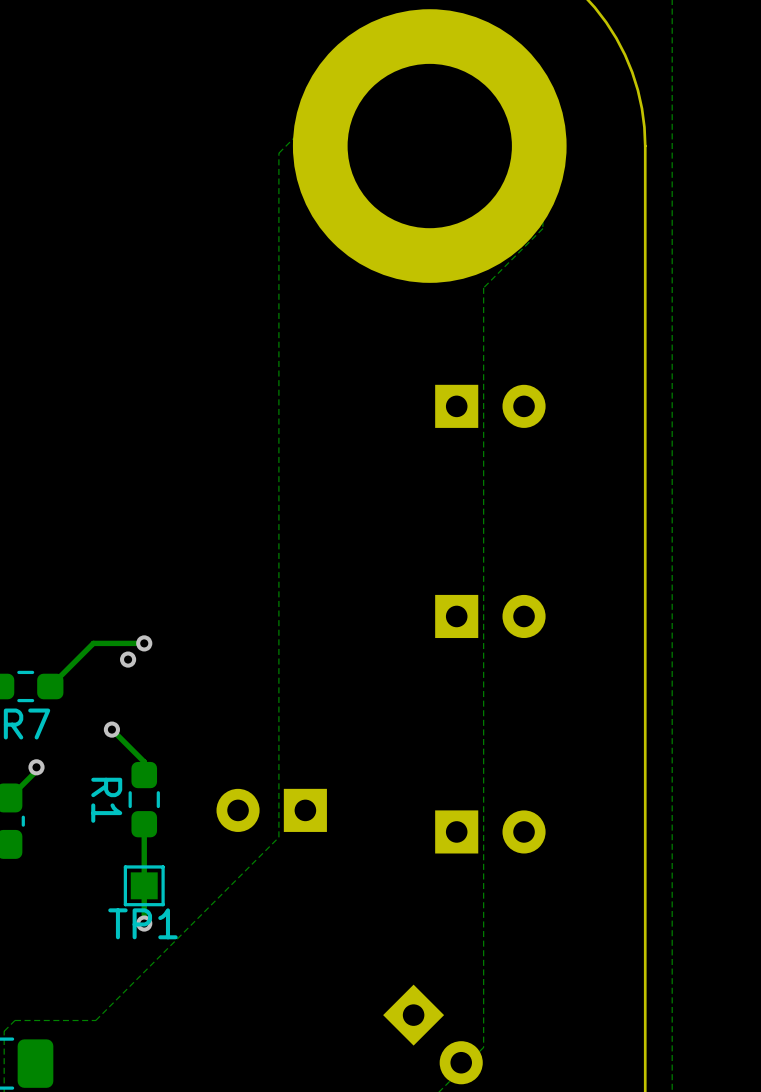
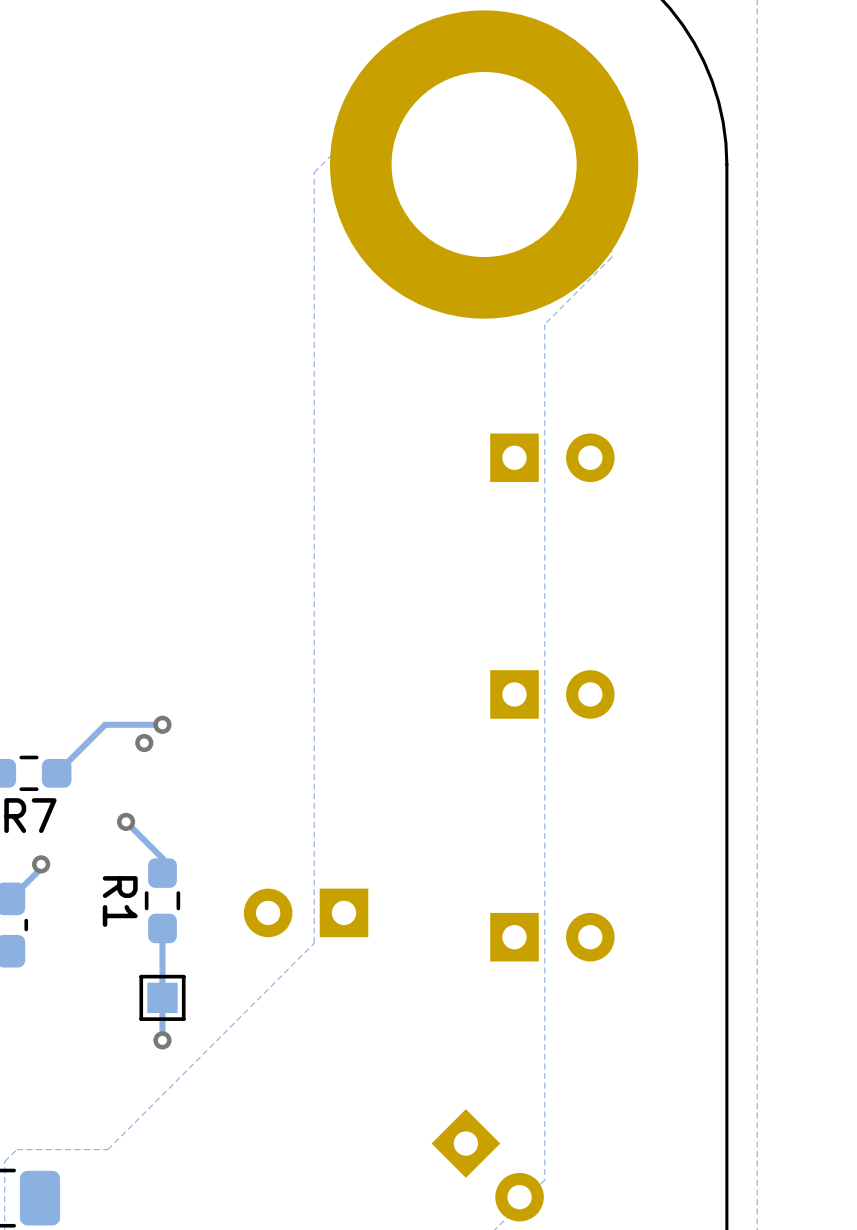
TP1 name: TP1 (142, 923) -> none

